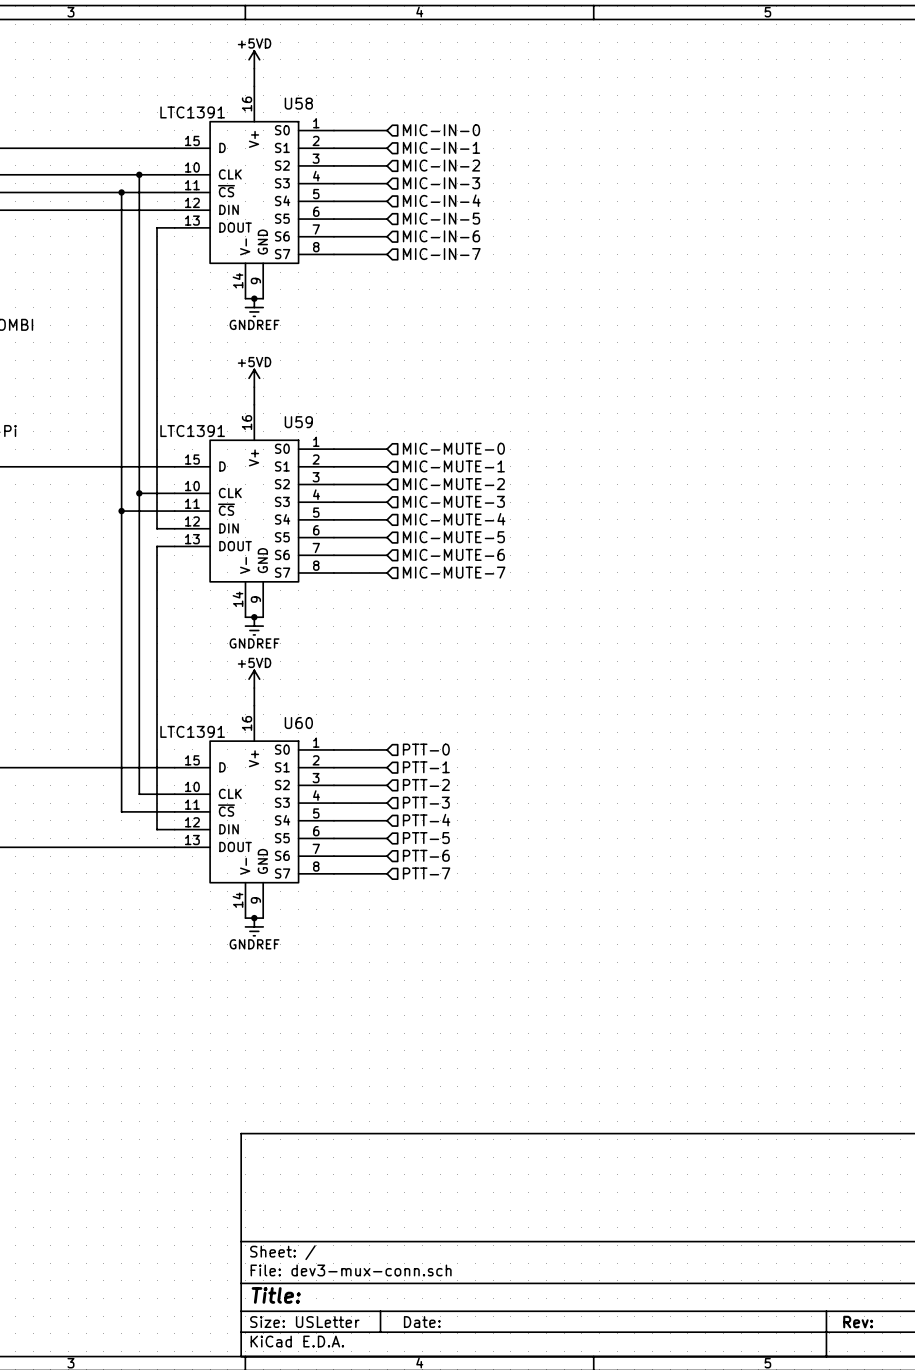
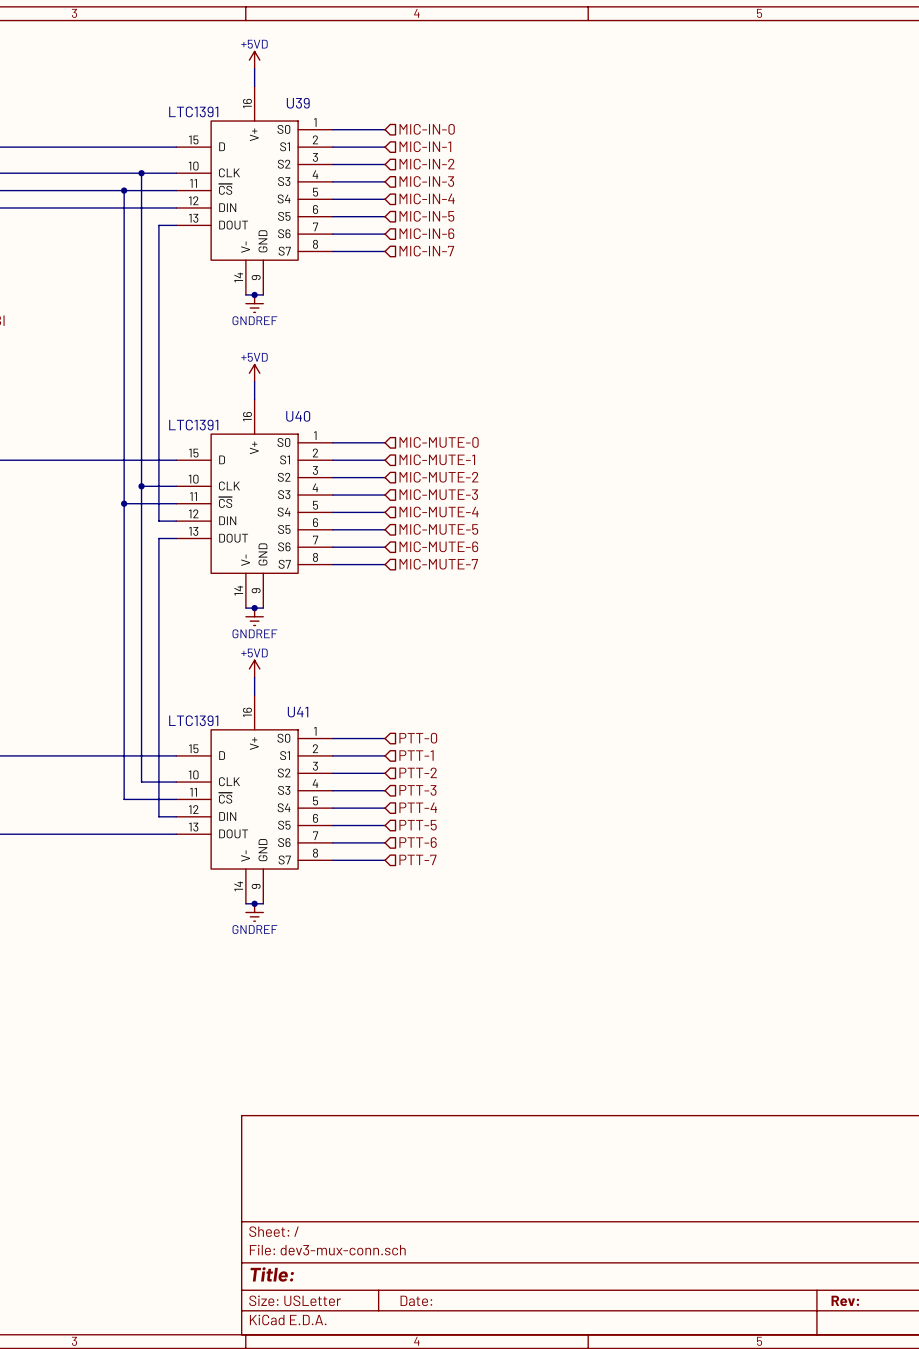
U58 name: U58 (298, 103) -> U39 (298, 103)
U59 name: U59 (298, 422) -> U40 (298, 416)
U60 name: U60 (298, 723) -> U41 (298, 712)

